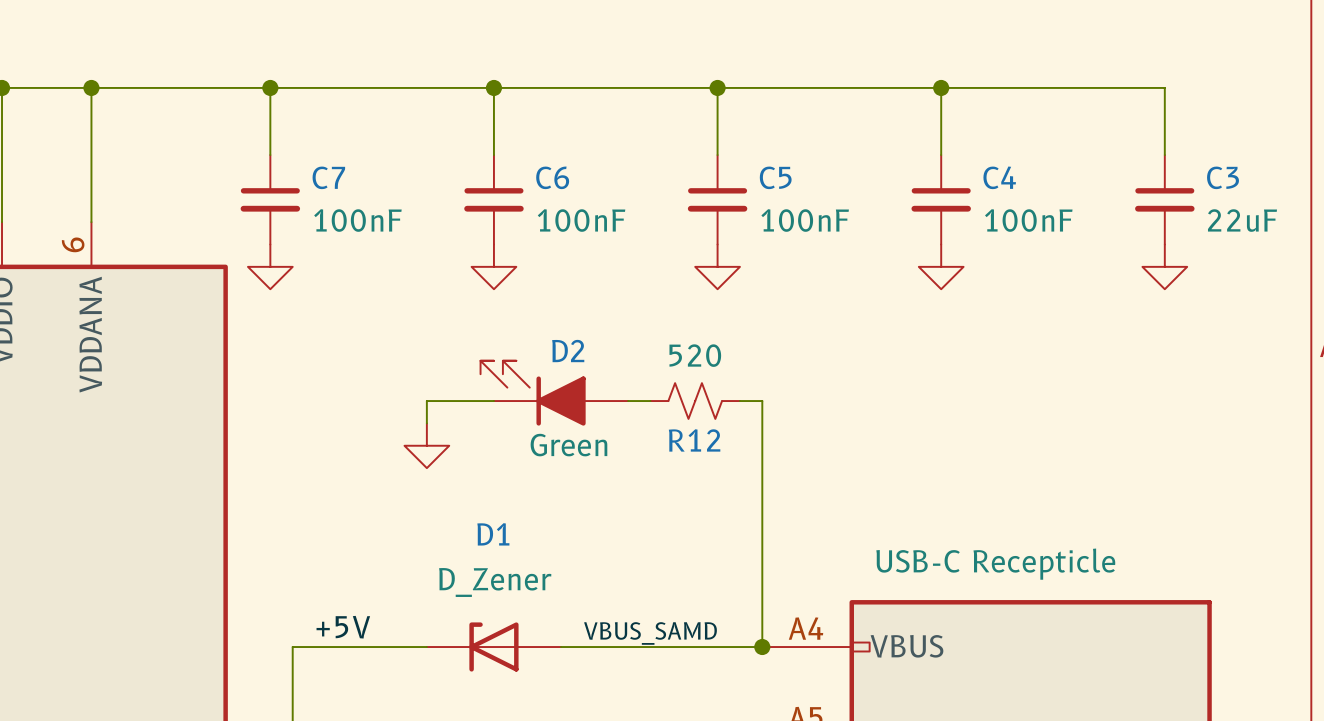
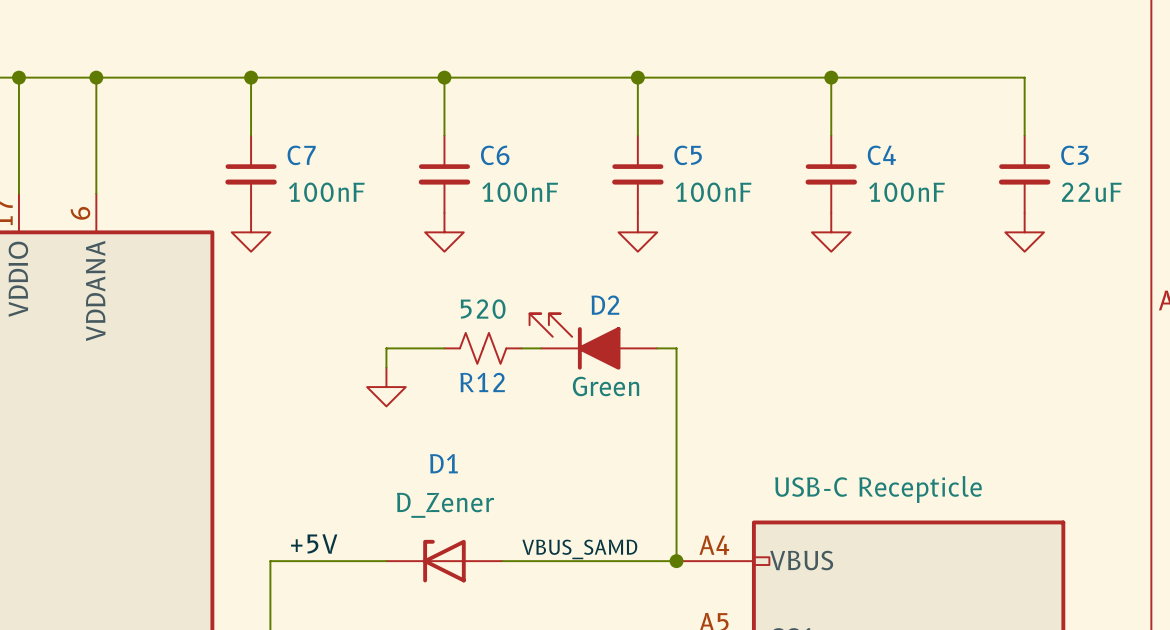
D2 position: (554, 393) -> (593, 341)
R12 position: (695, 401) -> (483, 348)

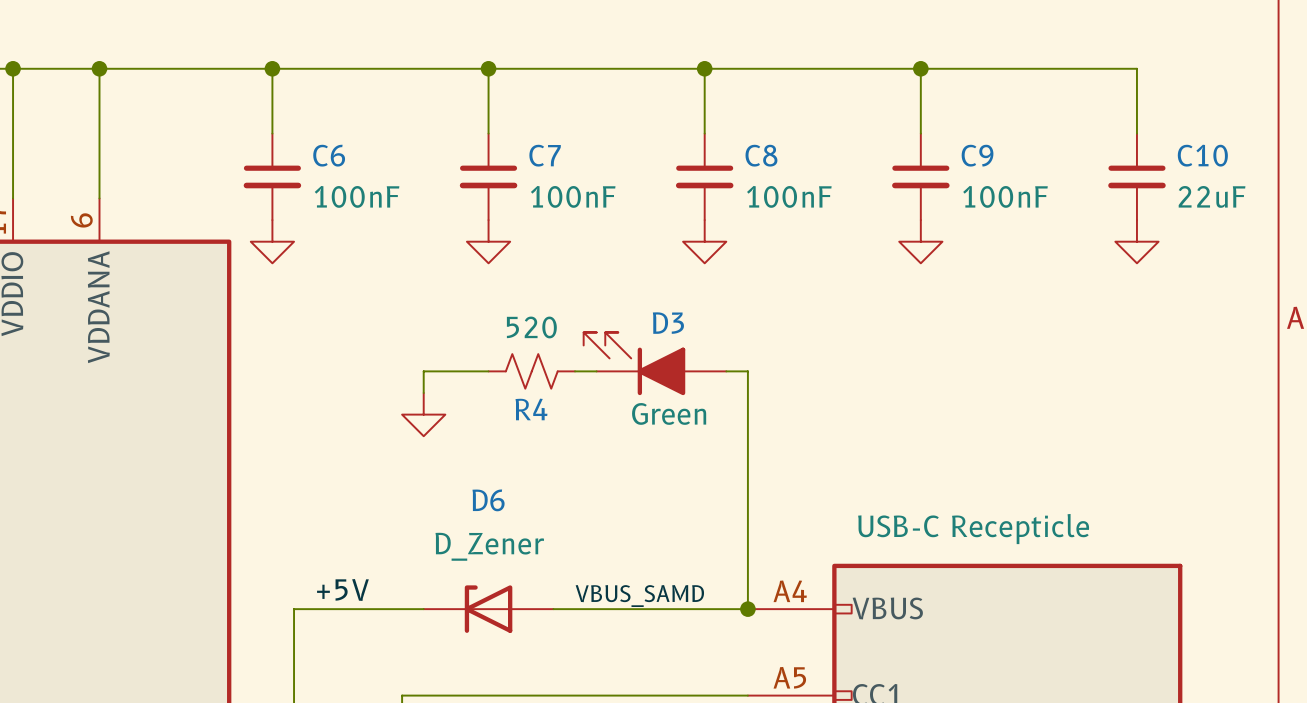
C7 name: C7 (301, 155) -> C6 (329, 155)
C6 name: C6 (495, 155) -> C7 (545, 155)
C5 name: C5 (688, 155) -> C8 (761, 155)
C4 name: C4 (881, 155) -> C9 (977, 155)
C3 name: C3 (1074, 155) -> C10 (1202, 155)
D2 name: D2 (605, 305) -> D3 (668, 323)
R12 name: R12 (482, 382) -> R4 (531, 409)
D1 name: D1 (443, 463) -> D6 (488, 500)

